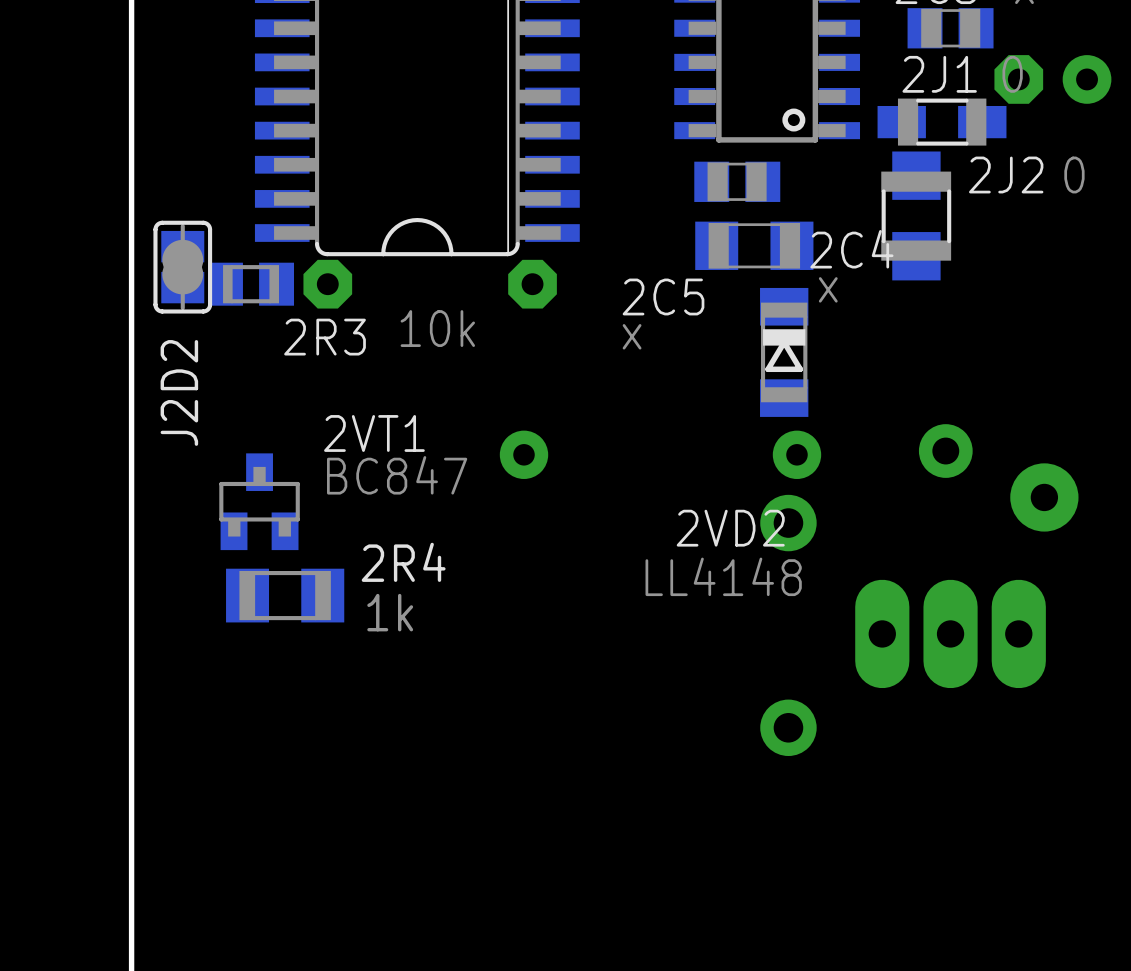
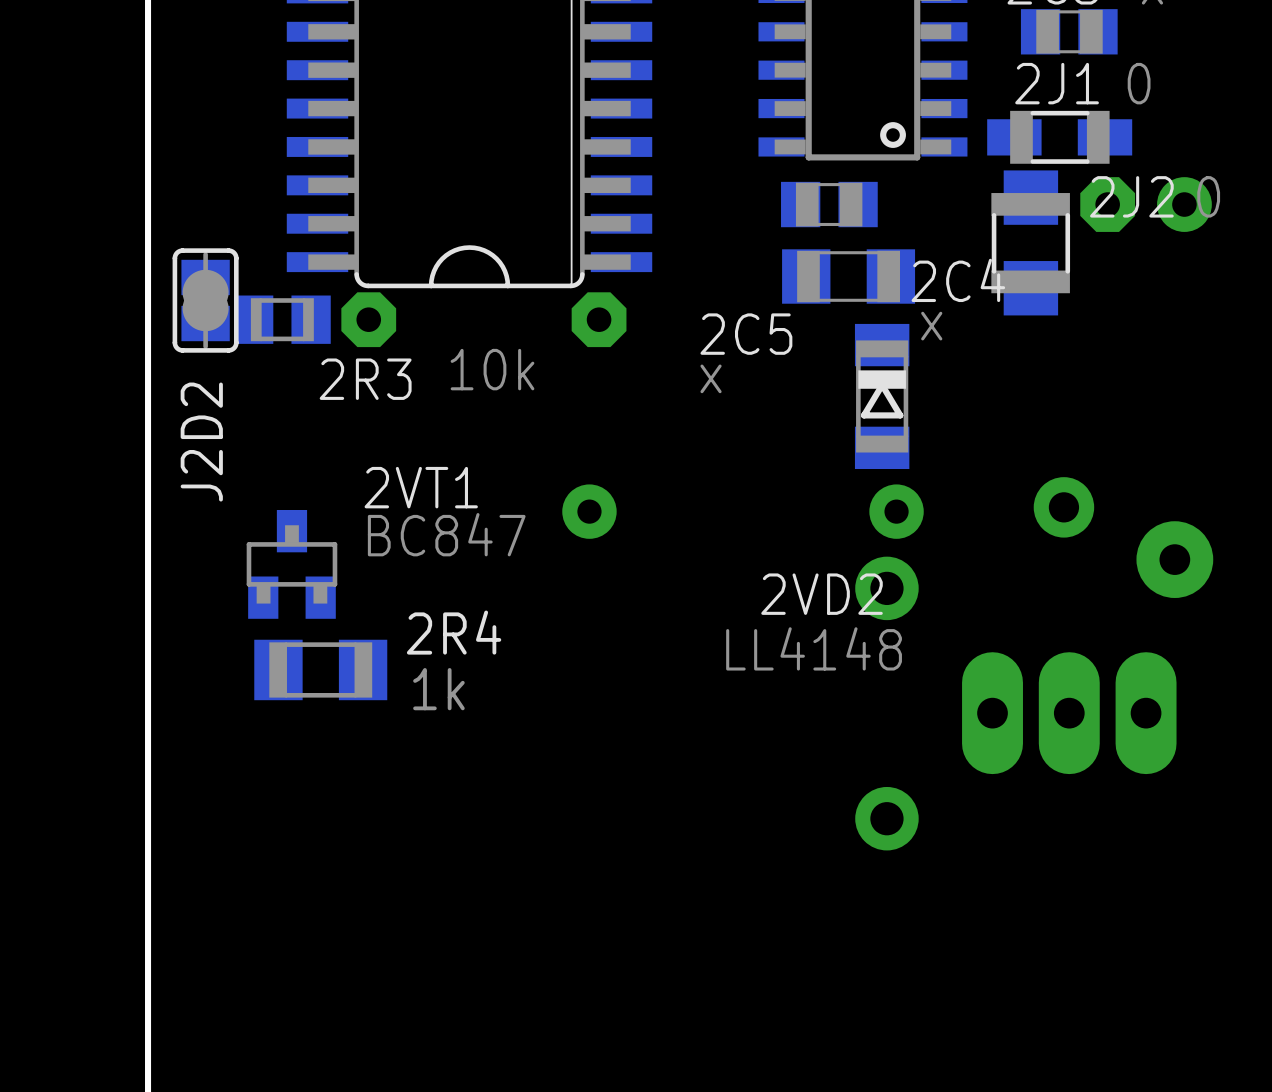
part position: (1052, 79) -> (1146, 204)

